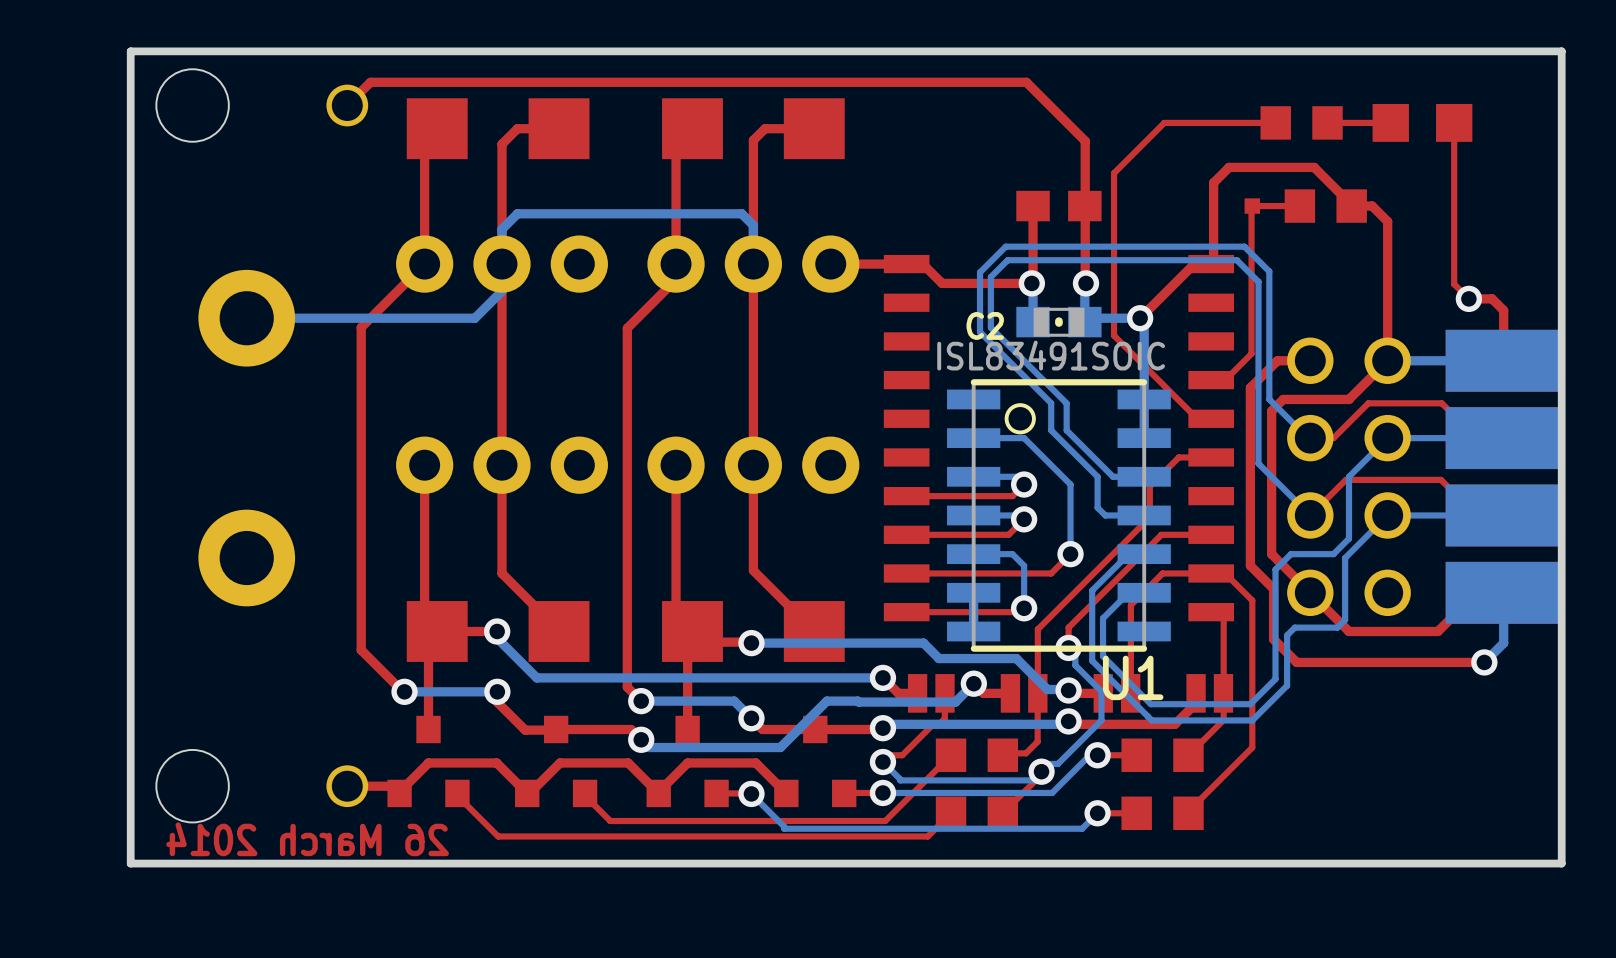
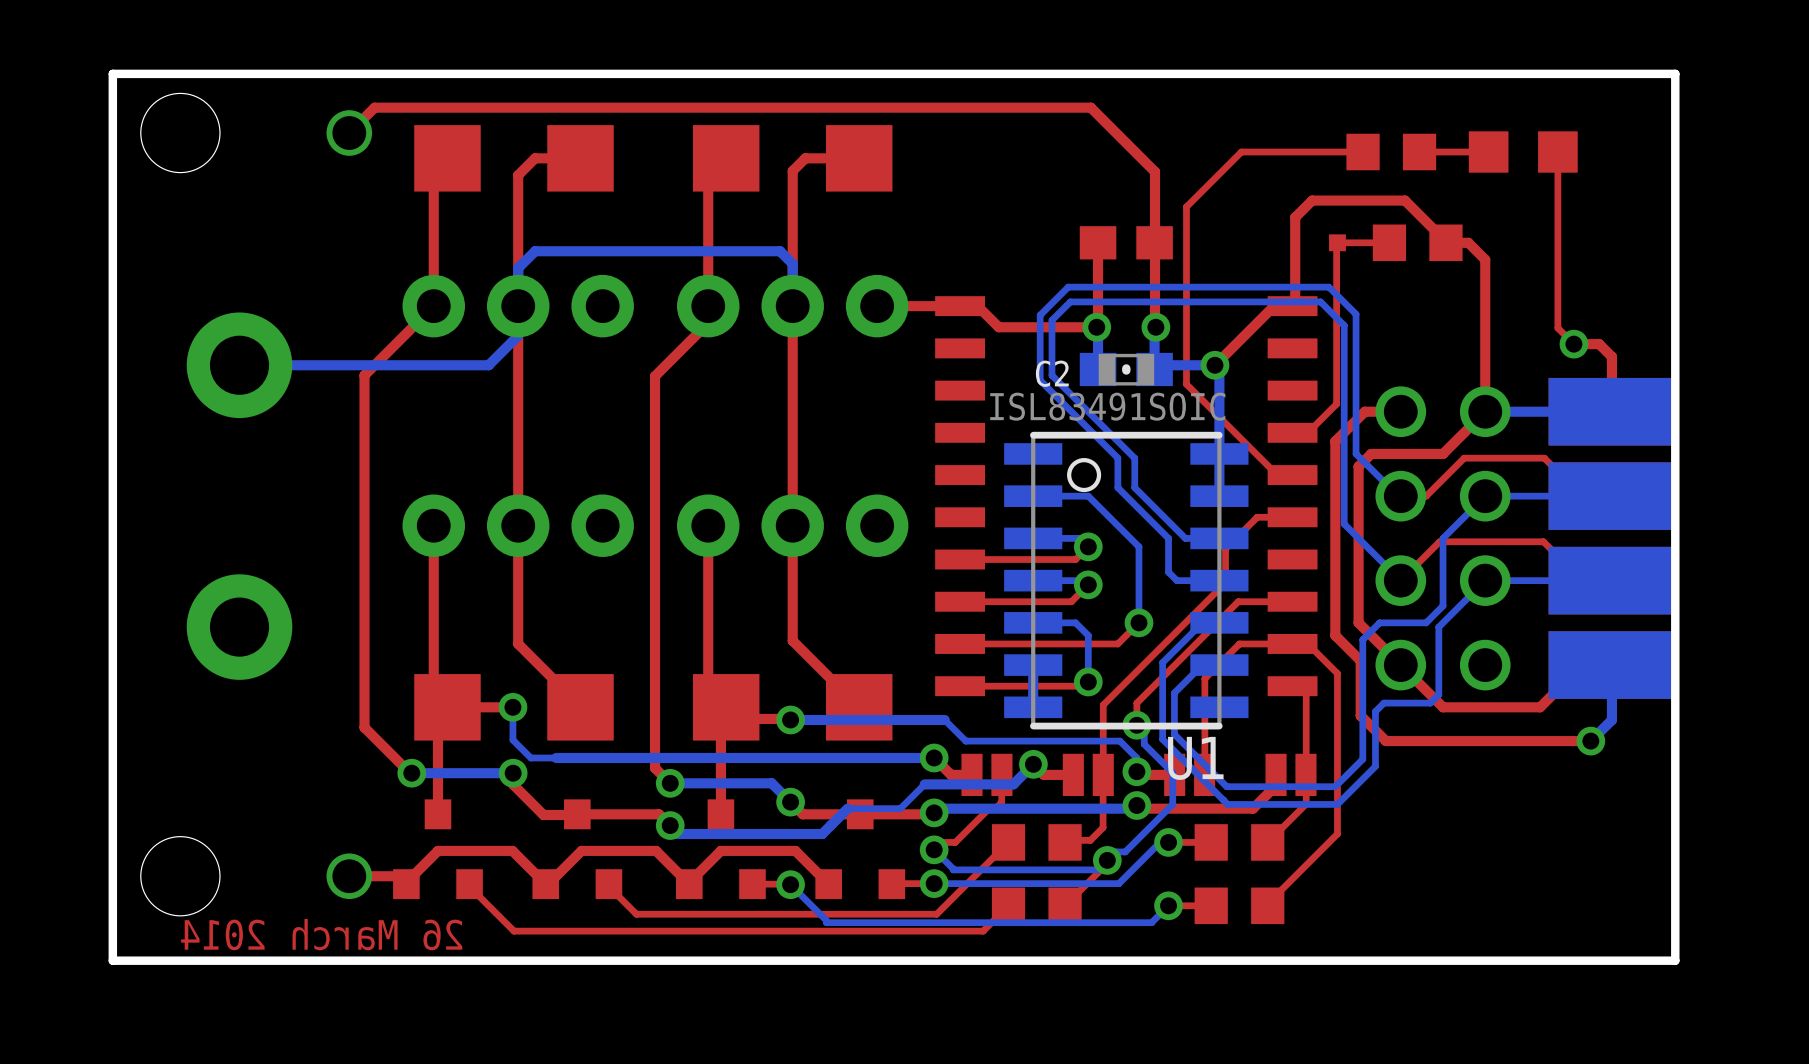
bottom track: (497, 638) (536, 677) -> (512, 714) (512, 740) (530, 757) (556, 757)
bottom track: (892, 643) (923, 643) (939, 658) (1016, 658) (1047, 689) (1068, 690) -> (944, 719) (965, 741) (1119, 741) (1136, 757) (1136, 771)
bottom track: (874, 702) (826, 701) (803, 724) -> (924, 784) (900, 808) (847, 808)

